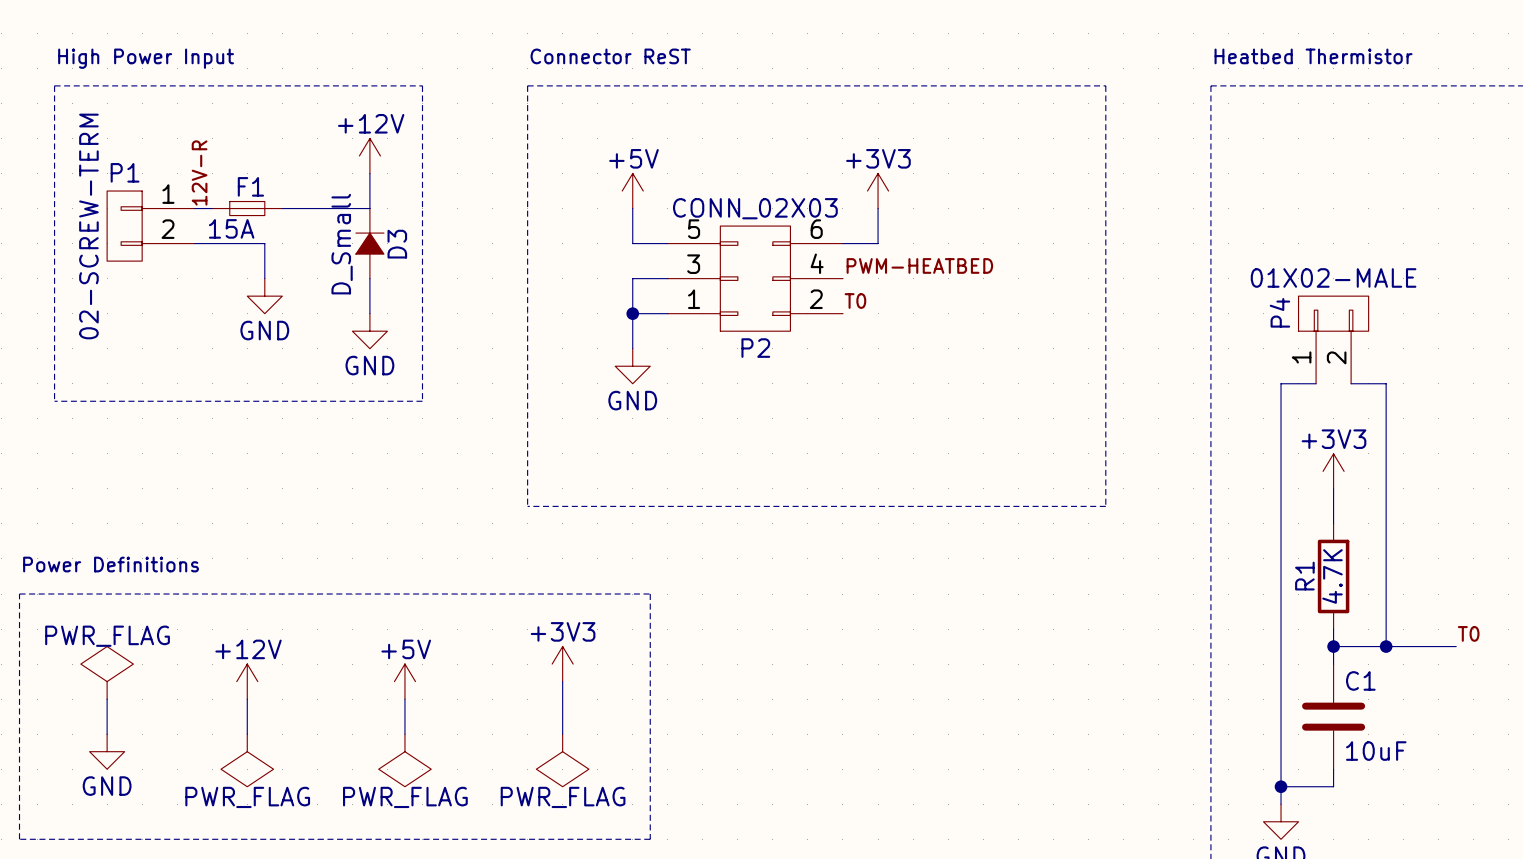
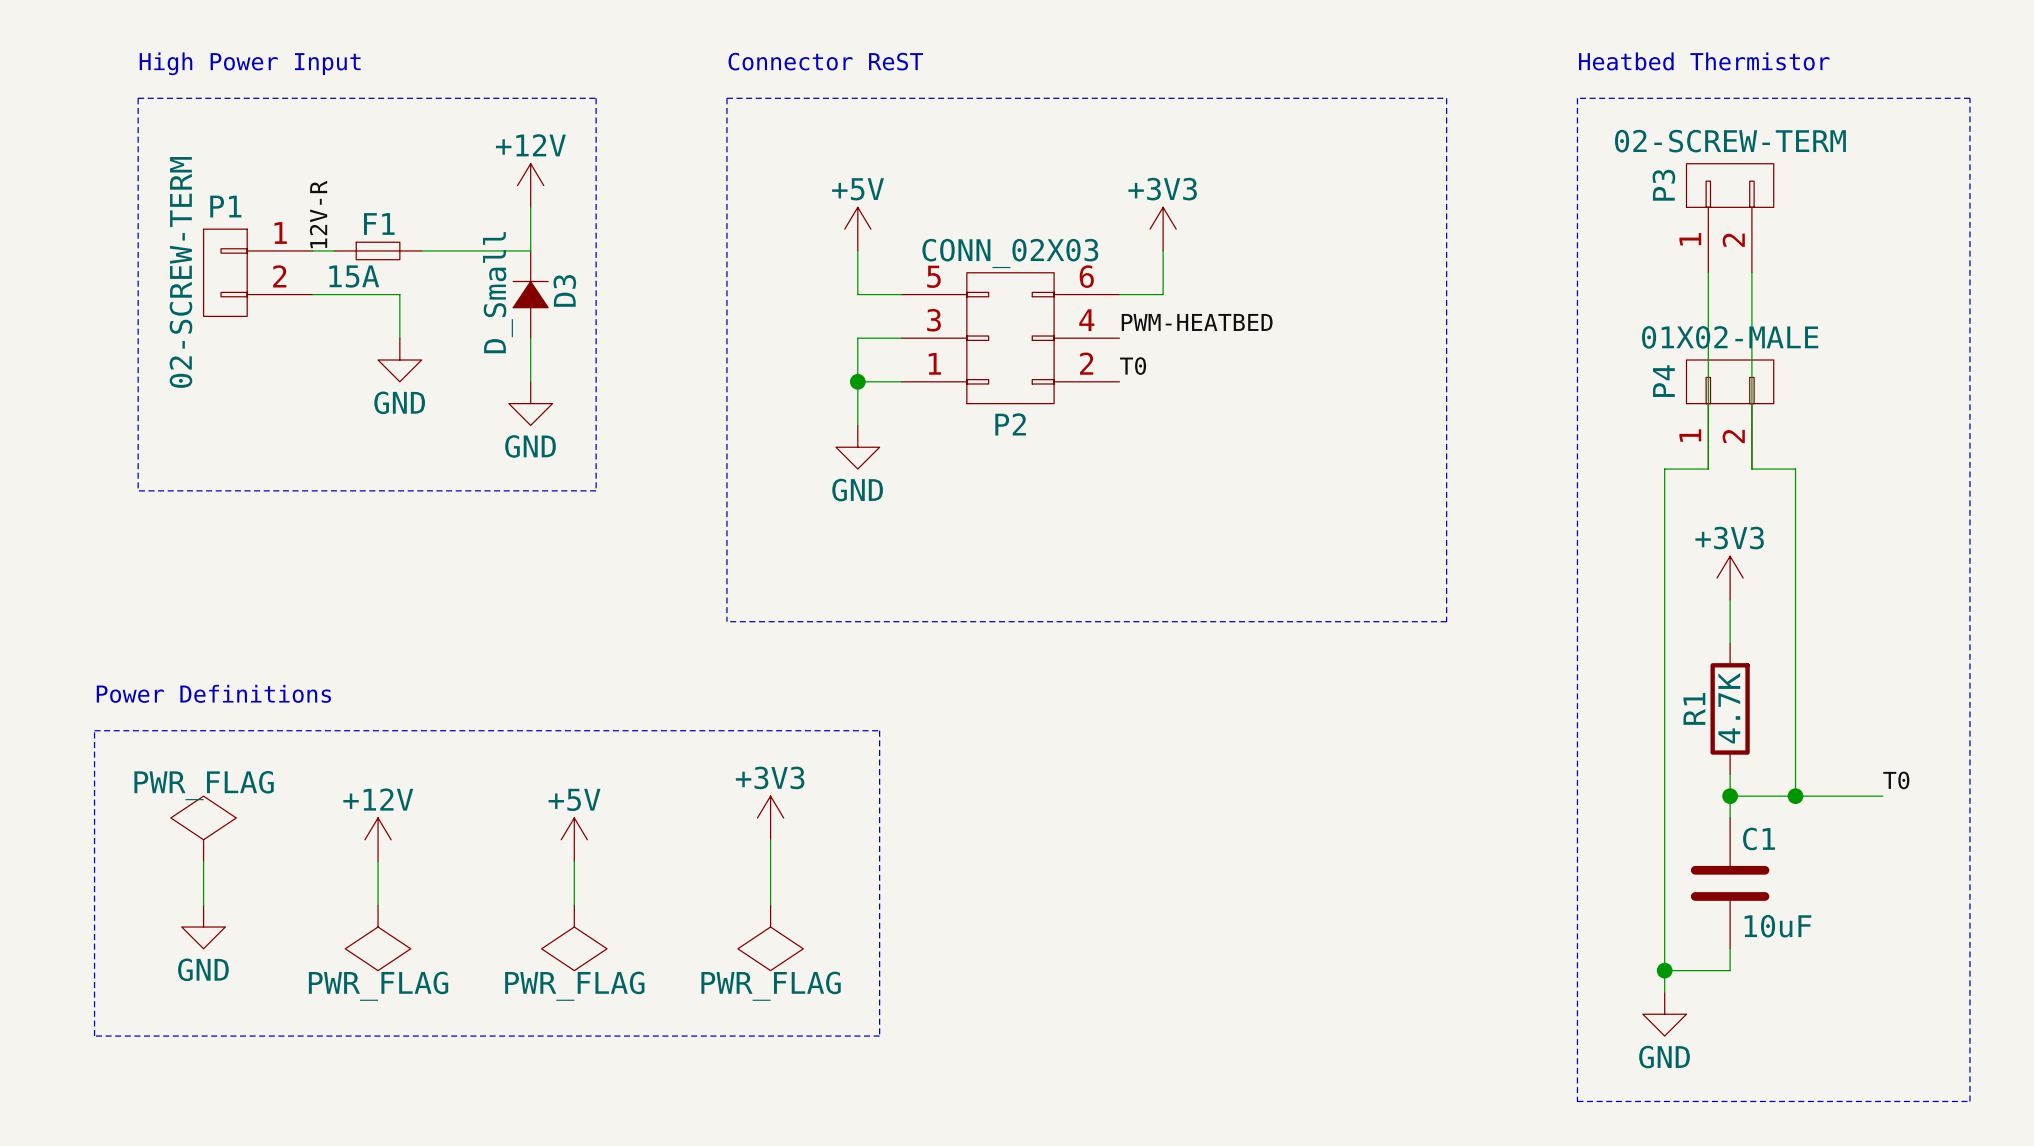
P3: none -> 02-SCREW-TERM (1730, 218)
wire: none -> (1708, 272) (1708, 469)
wire: none -> (1751, 272) (1751, 469)

